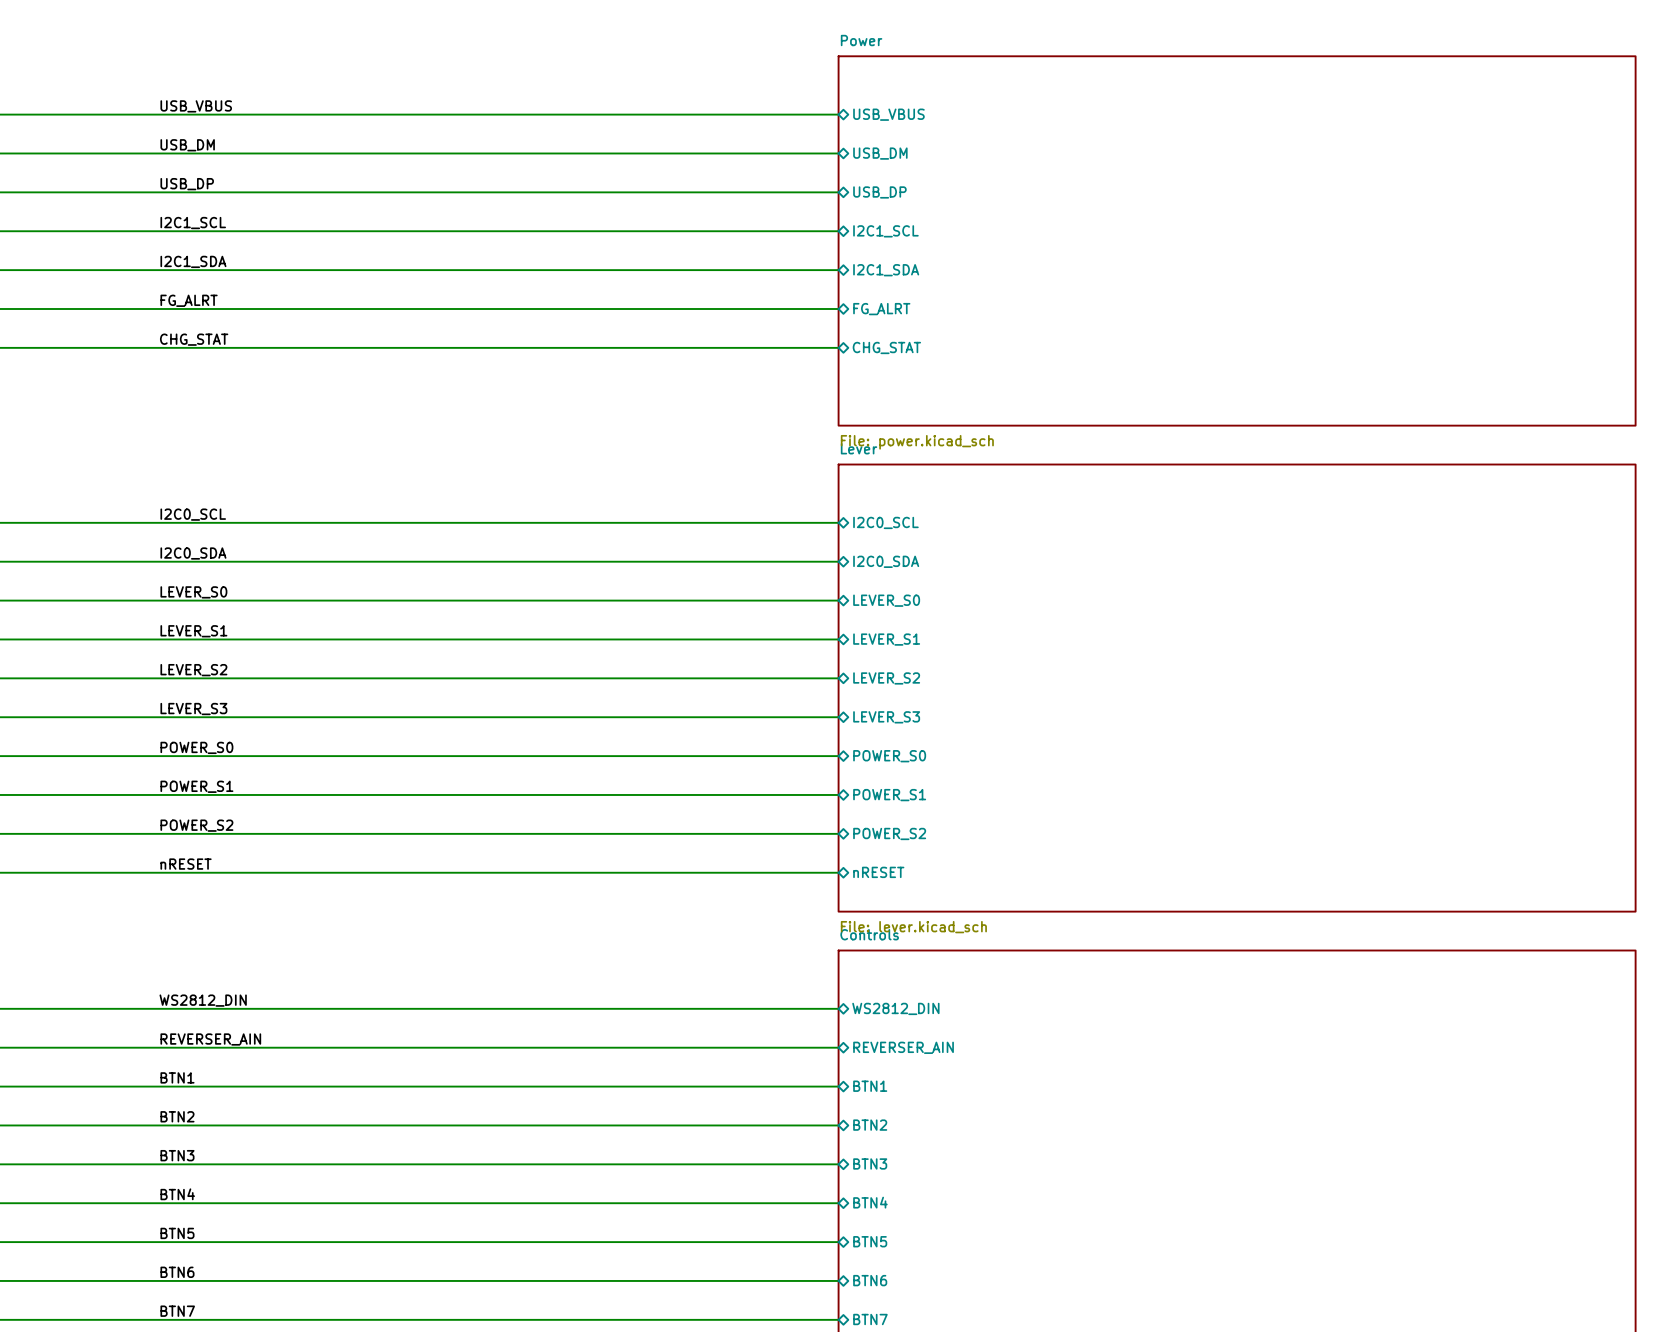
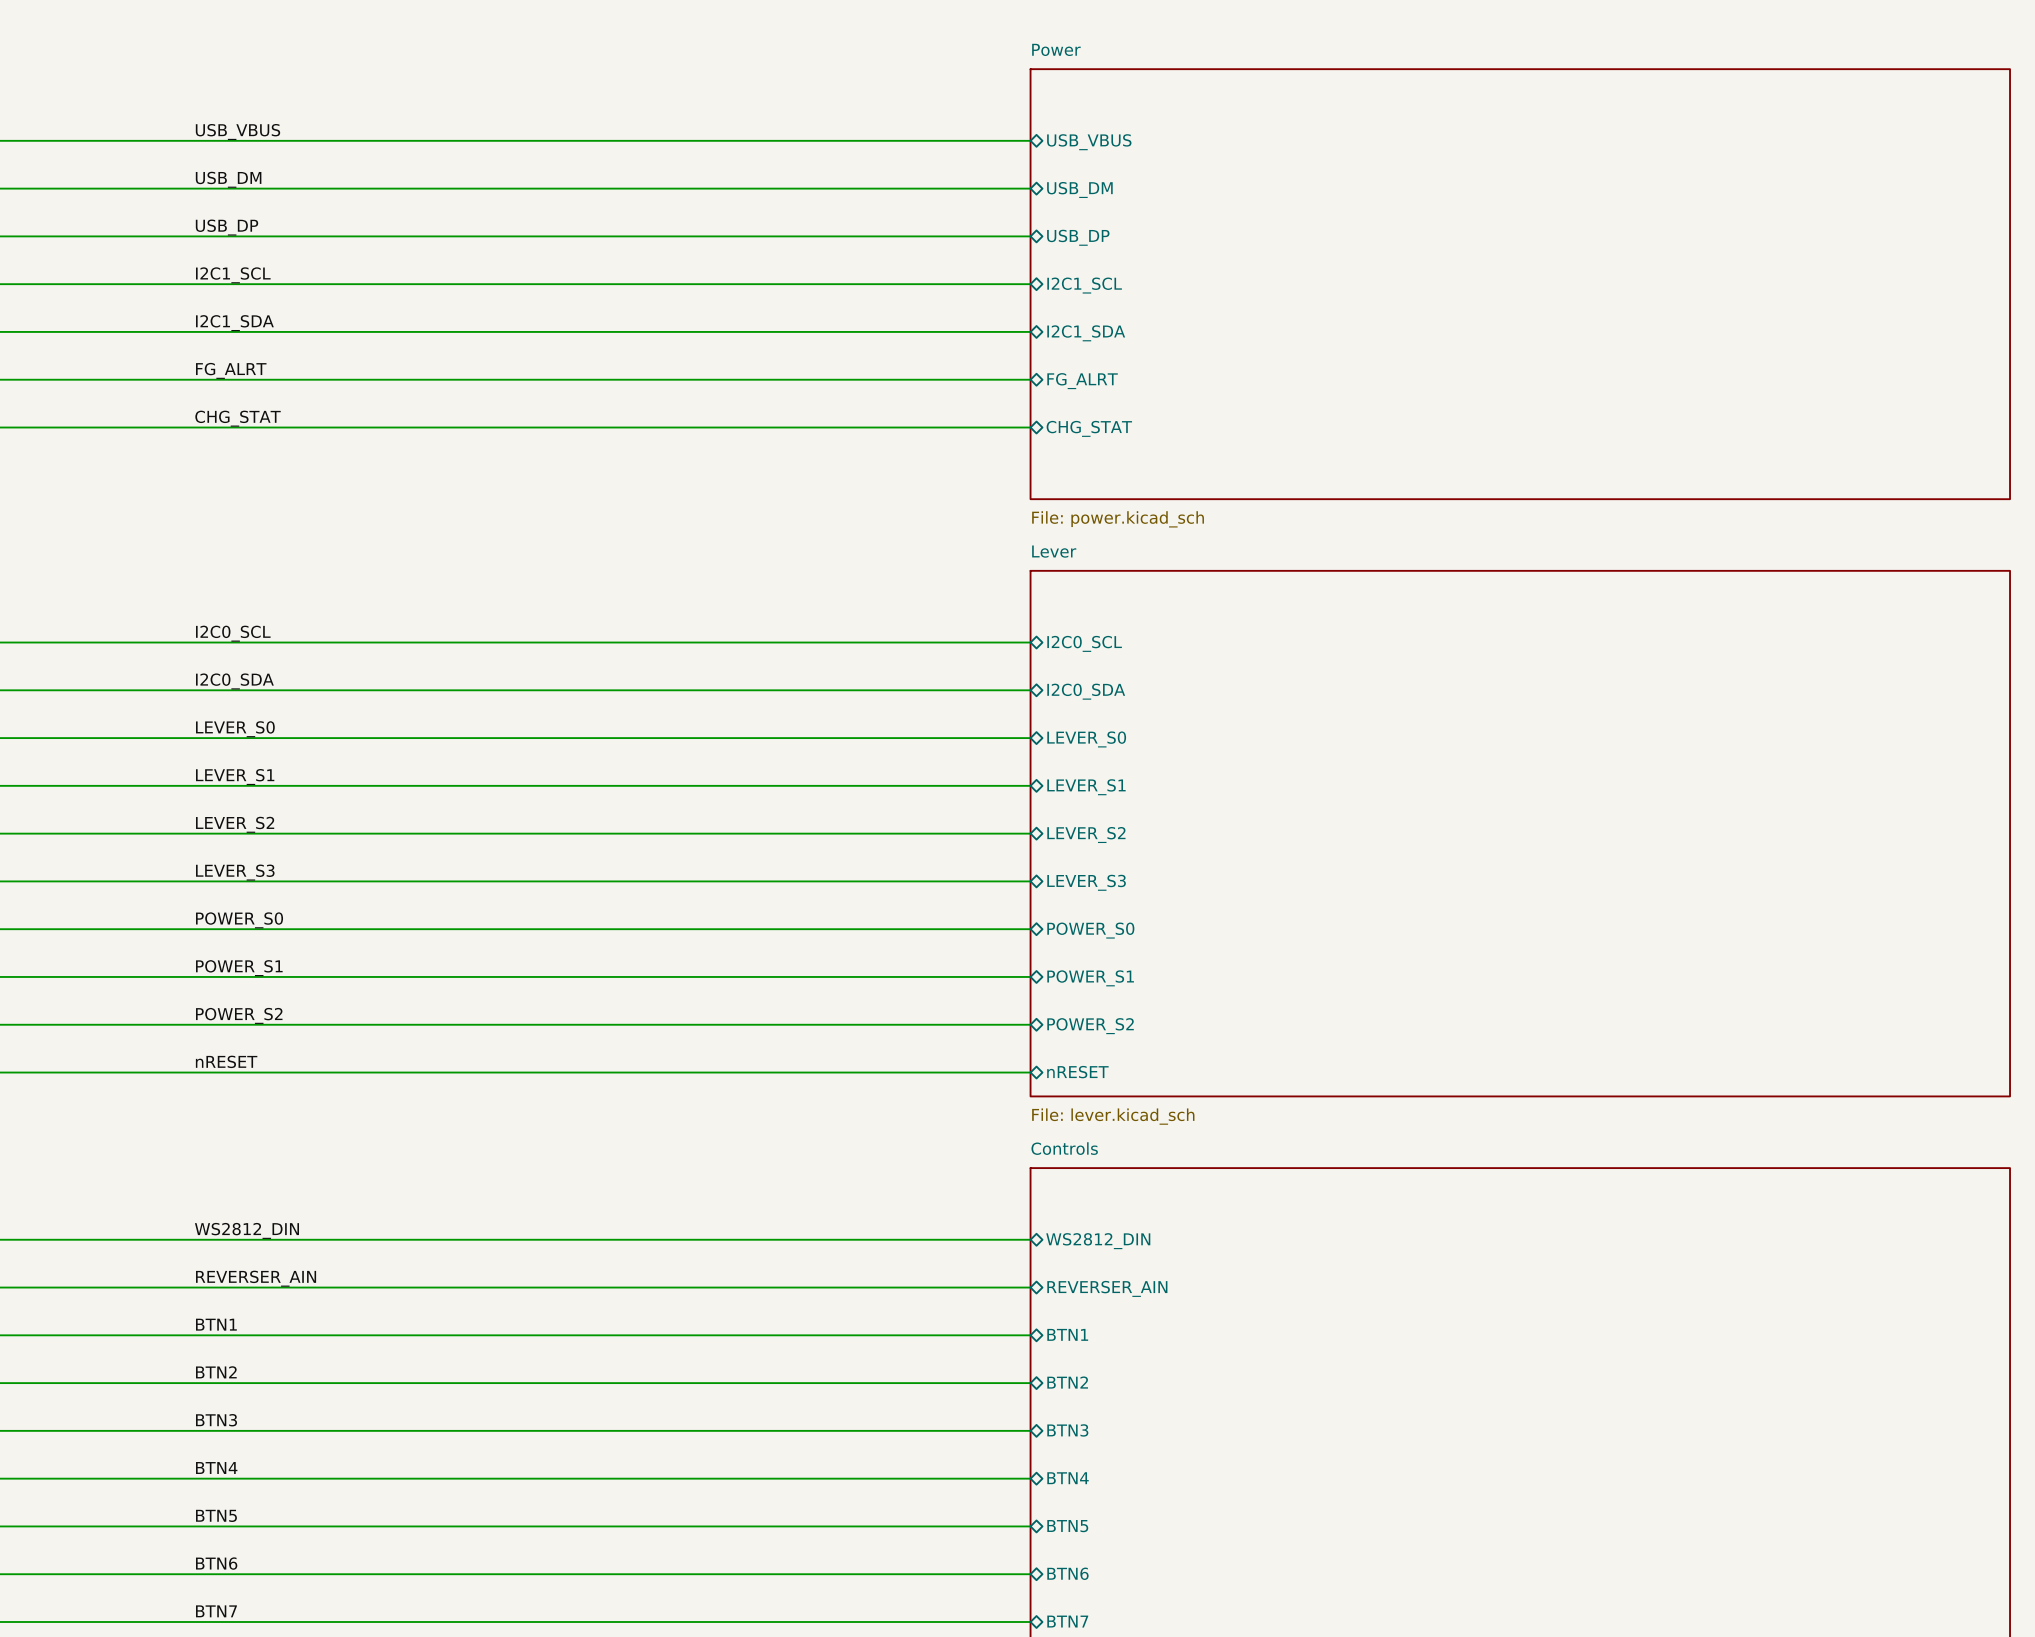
sheet Power: none -> File: power.kicad_sch (1520, 284)
sheet Power: File: power.kicad_sch (1237, 240) -> none
sheet Lever: none -> File: lever.kicad_sch (1520, 833)
sheet Lever: File: lever.kicad_sch (1237, 688) -> none

